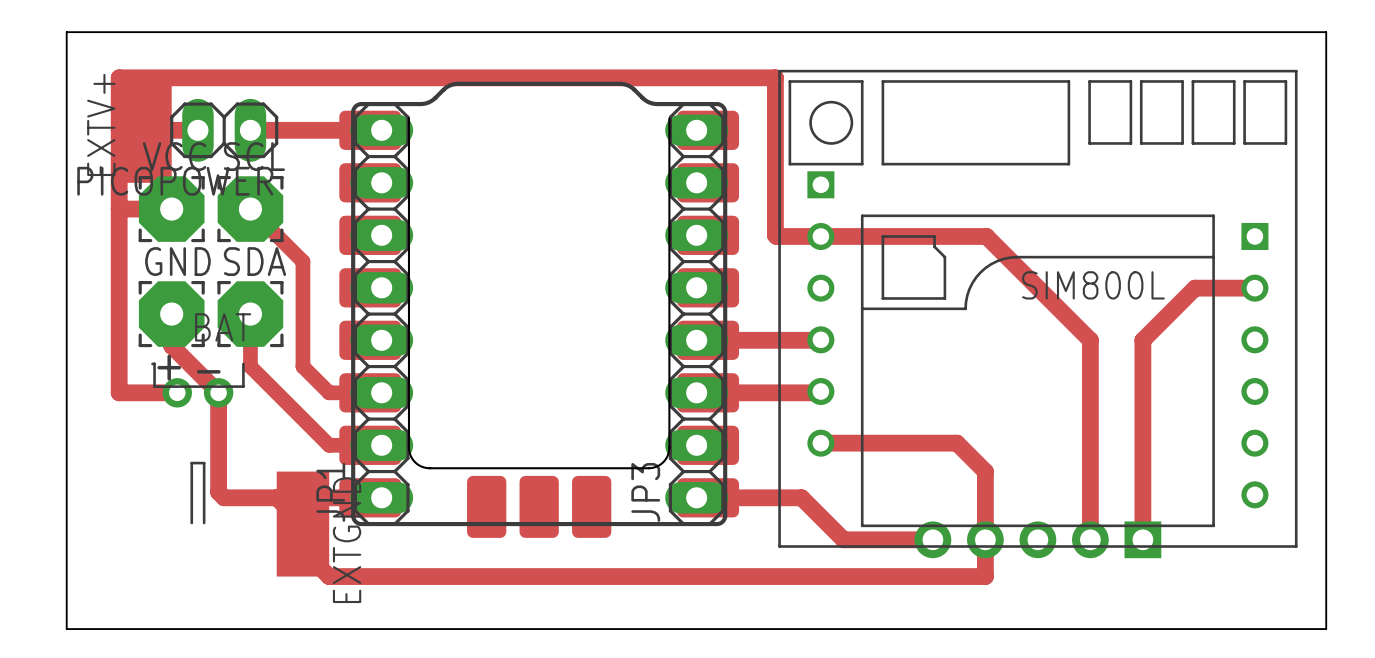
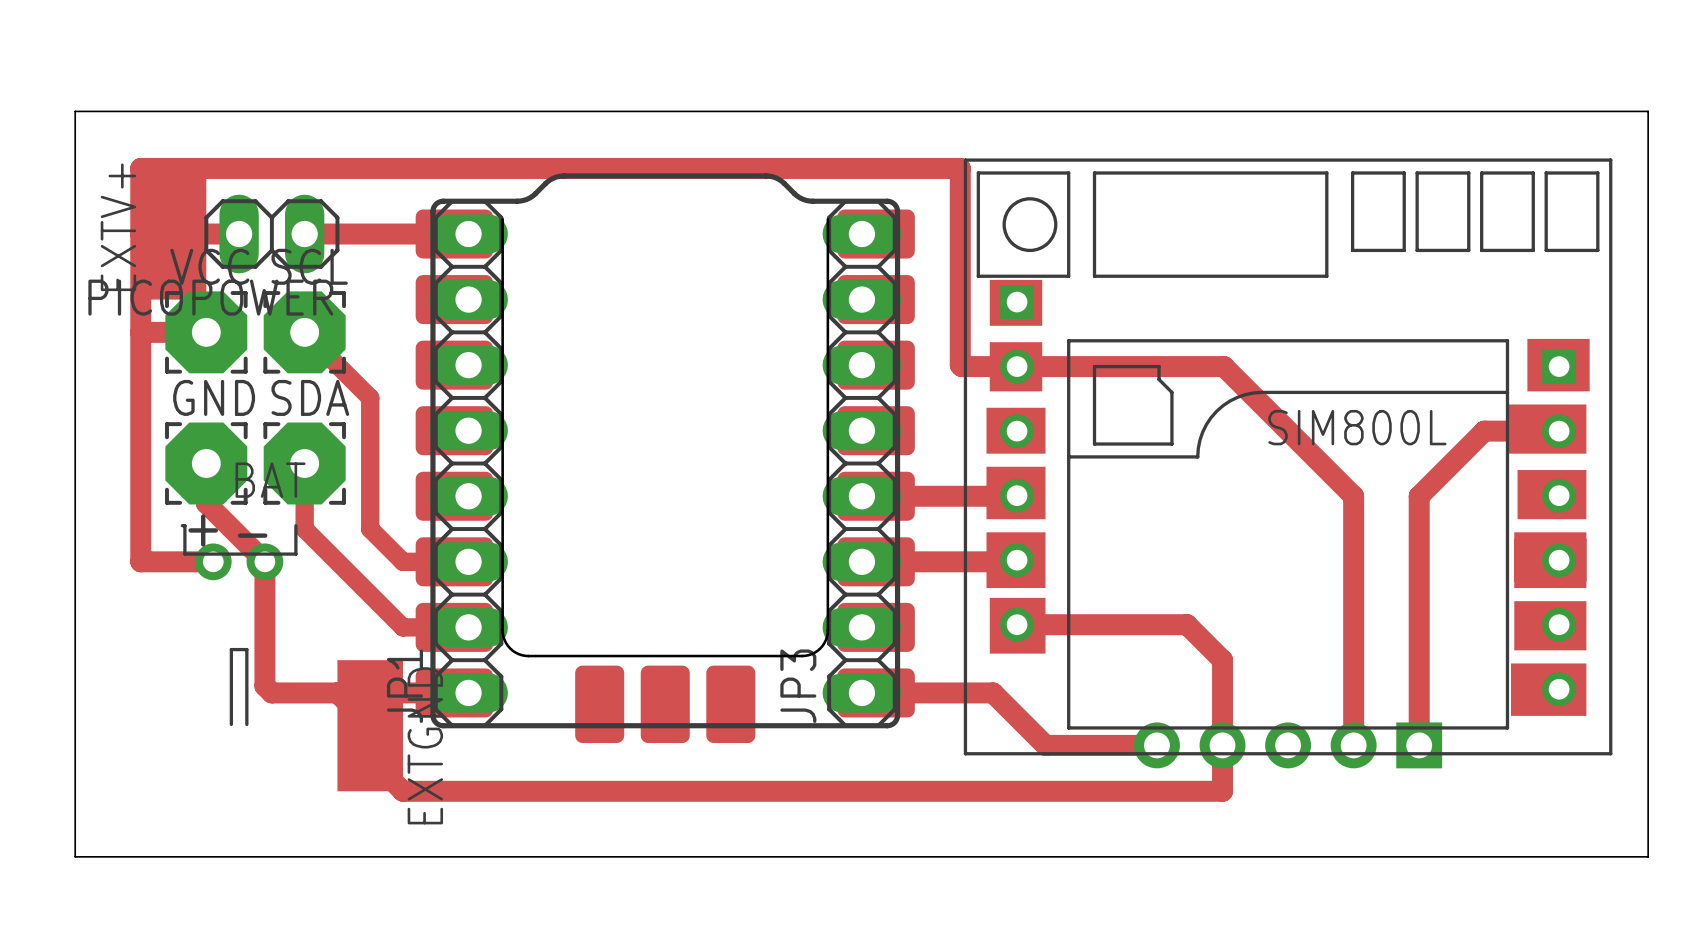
drawing: none -> [986, 279, 1046, 654]
drawing: none -> [1507, 338, 1590, 716]

